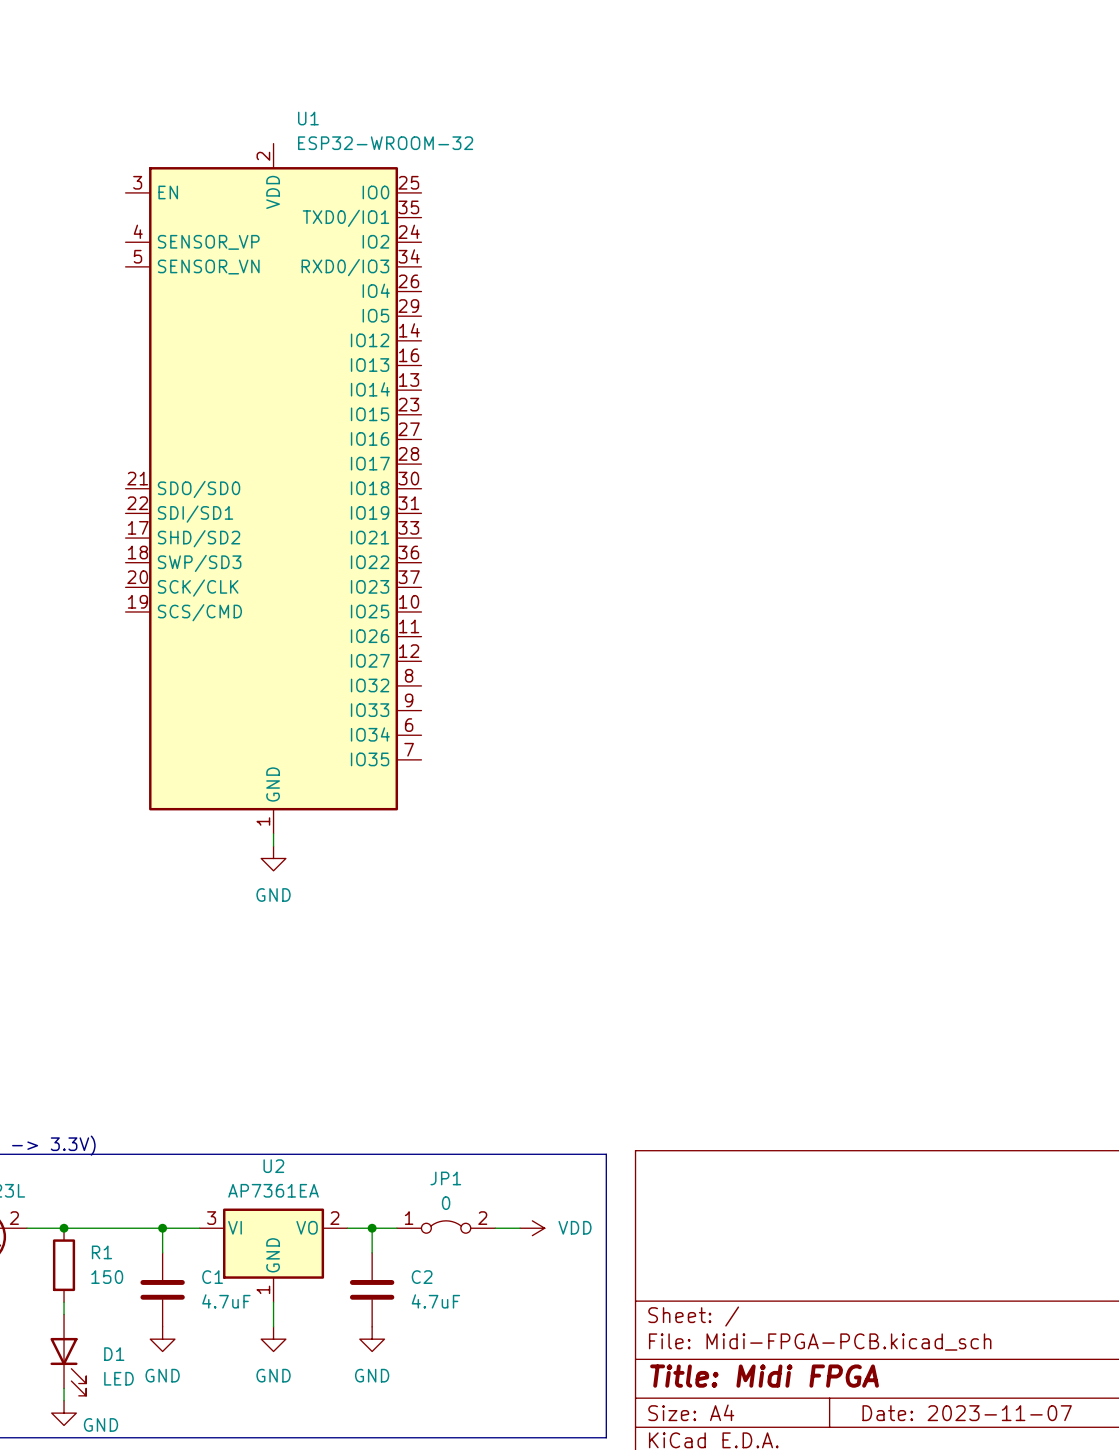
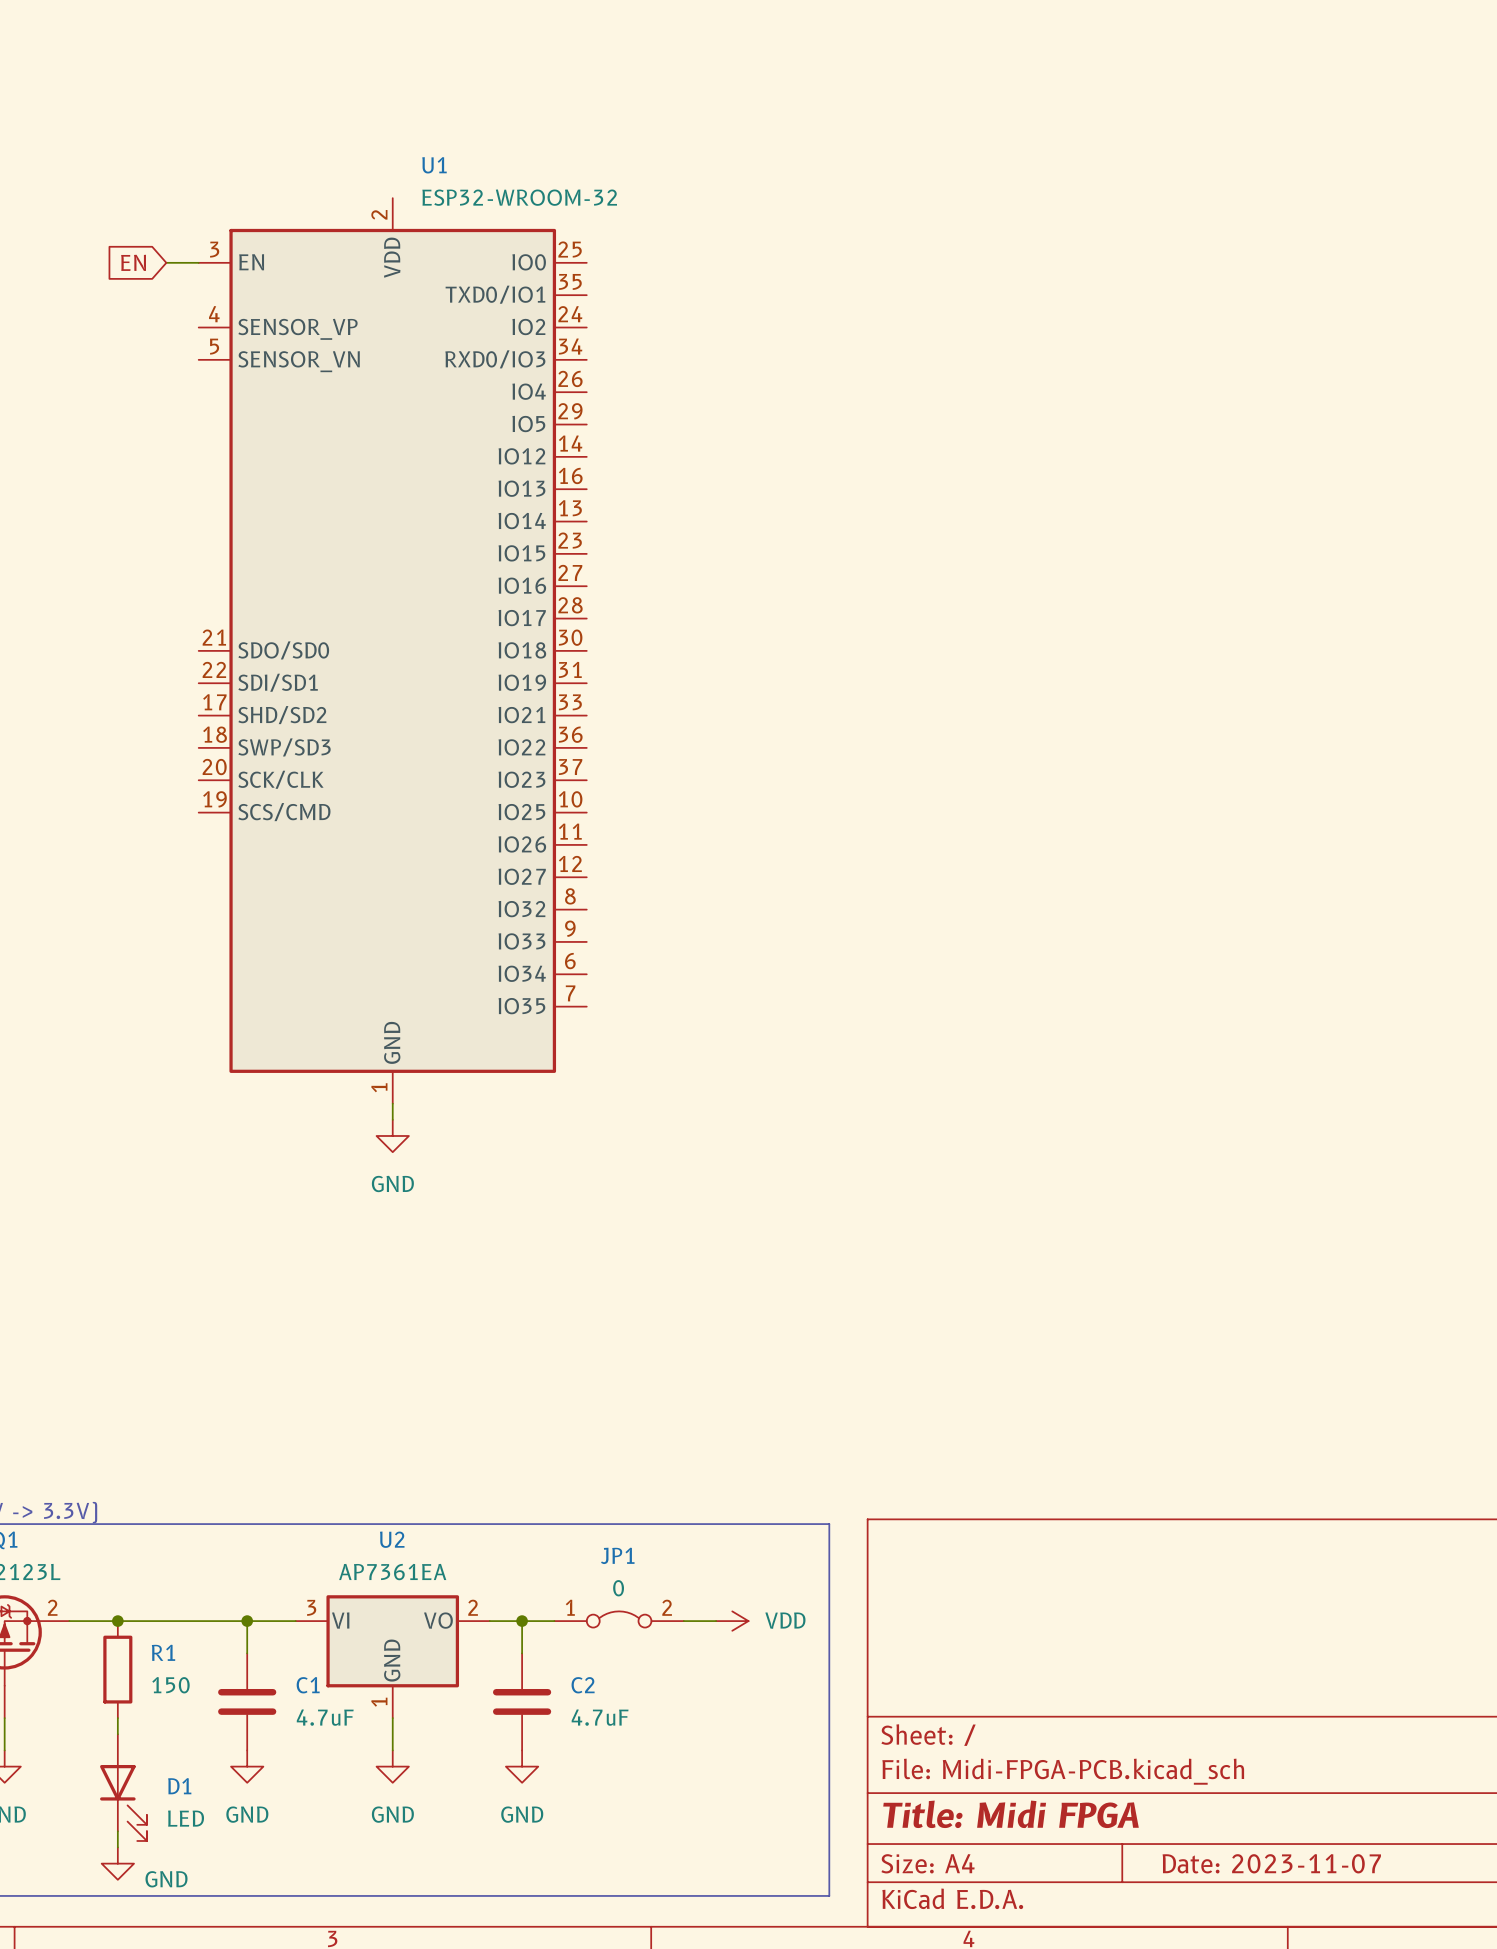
global label: none -> EN (133, 262)
wire: none -> (166, 262) (198, 262)

